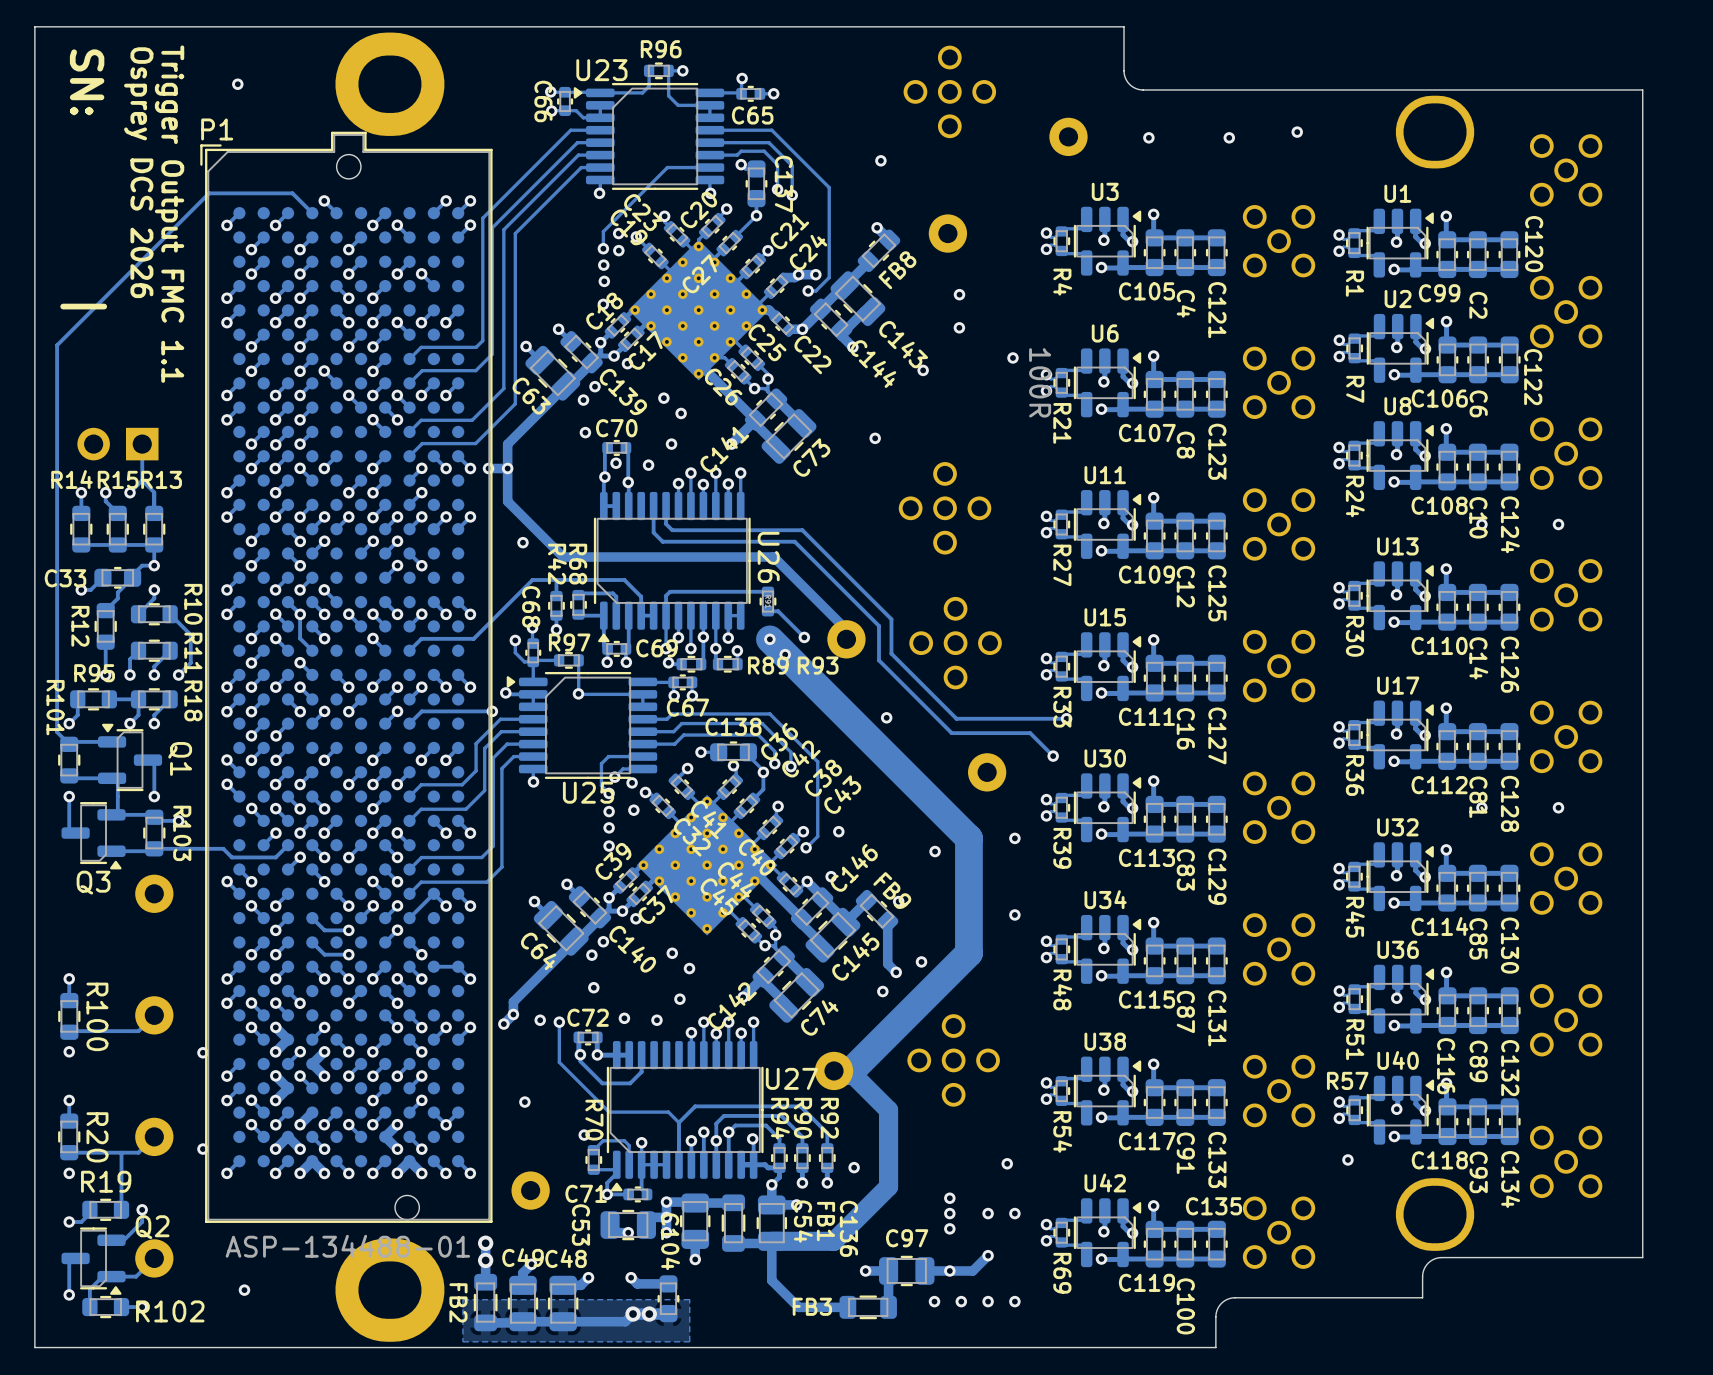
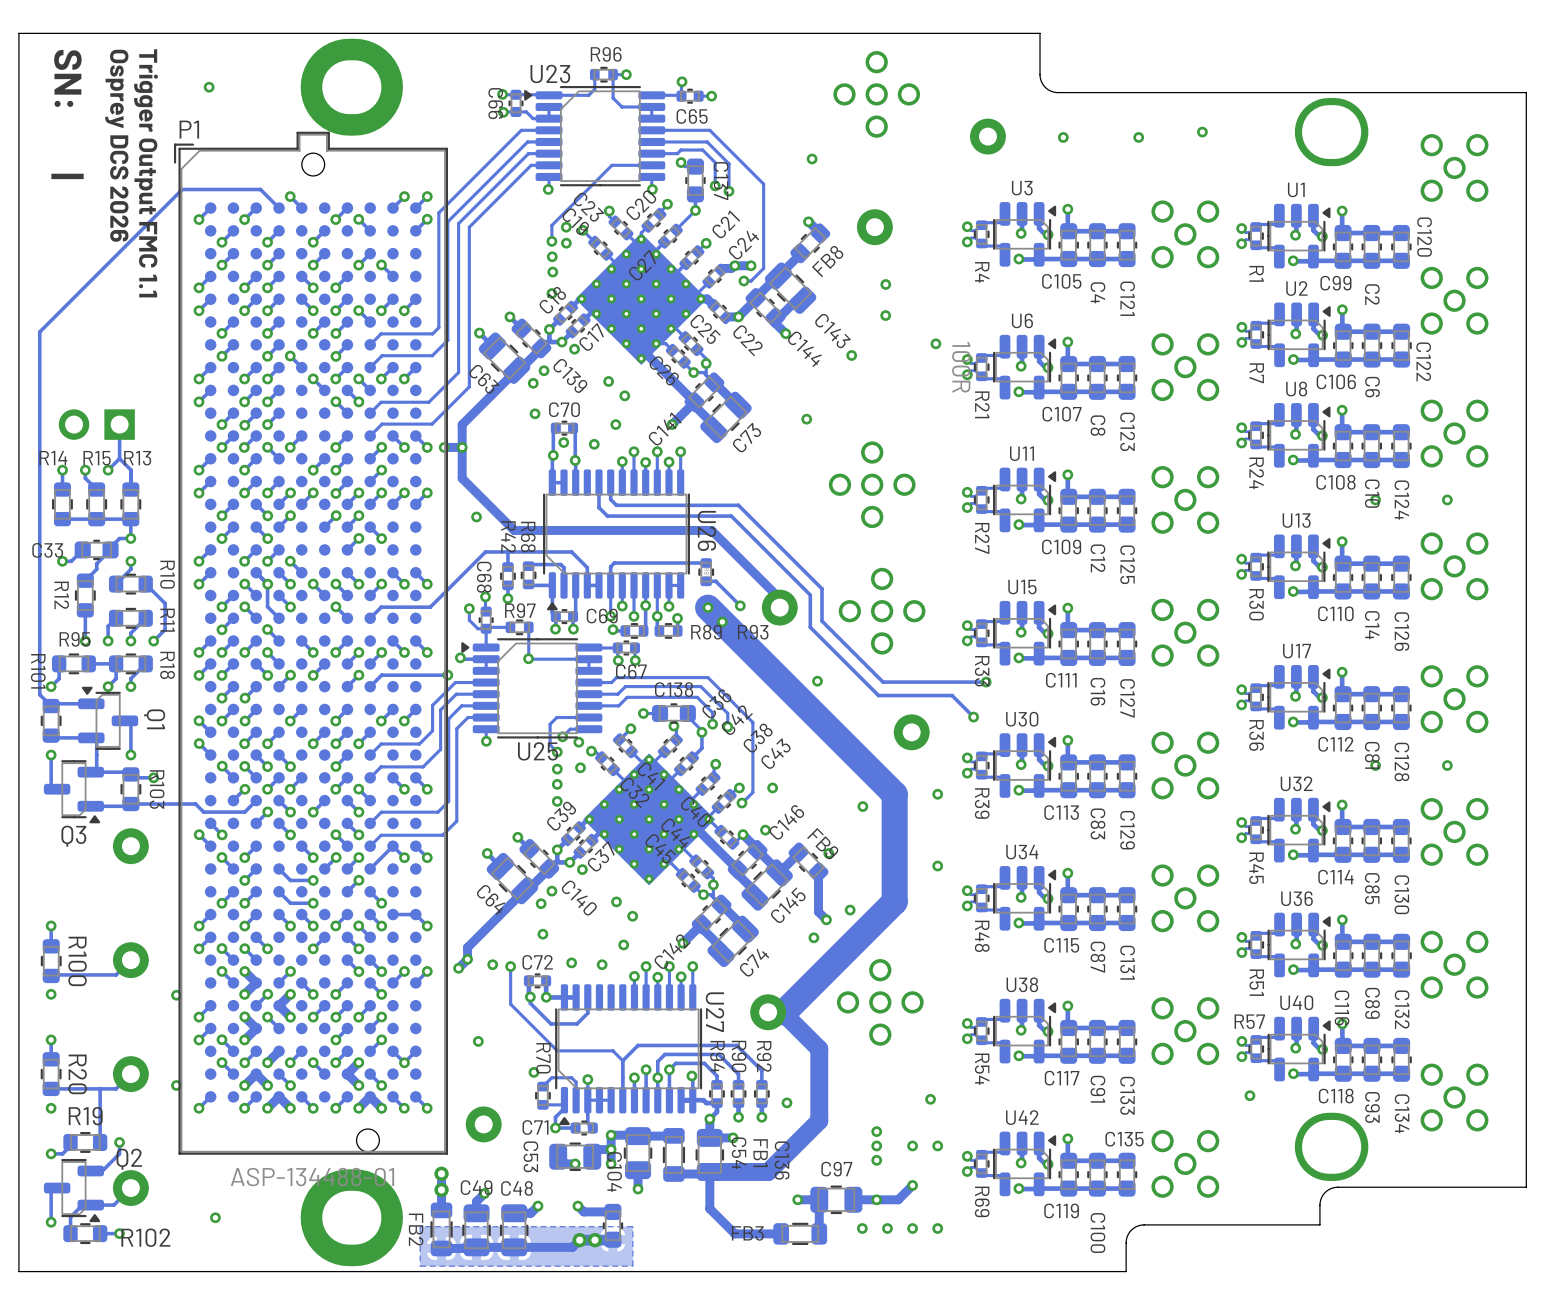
U27 name rotation: 0° (791, 1078) -> 90° clockwise (714, 1012)

